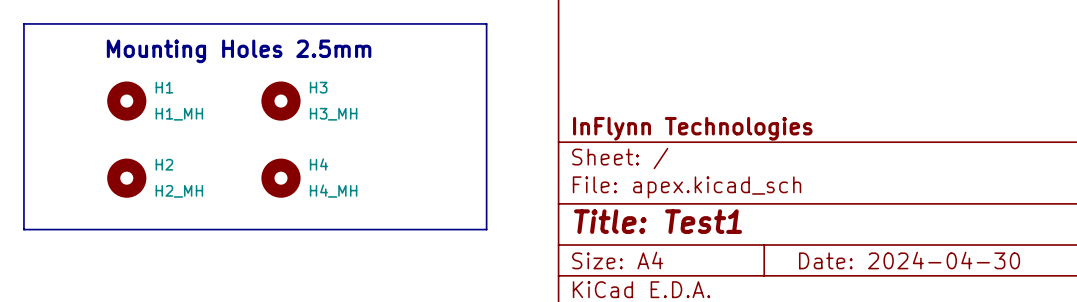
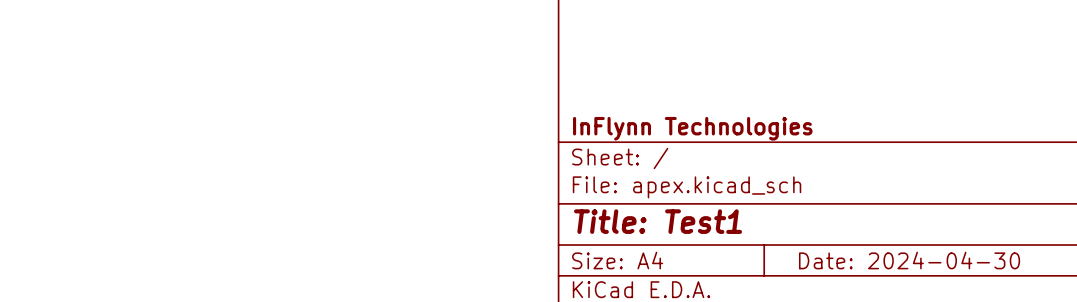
line: (23, 23) (486, 23) (486, 229) (23, 229) (23, 23) -> none
text: Mounting Holes 2.5mm (239, 51) -> none
H1: H1_MH (126, 101) -> none
H3: H3_MH (280, 101) -> none
H2: H2_MH (126, 178) -> none
H4: H4_MH (280, 178) -> none

